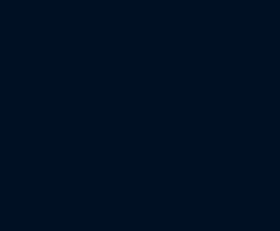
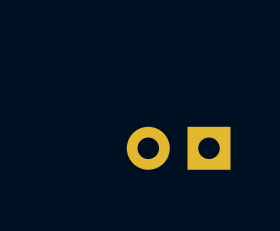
part: none -> (178, 148)

